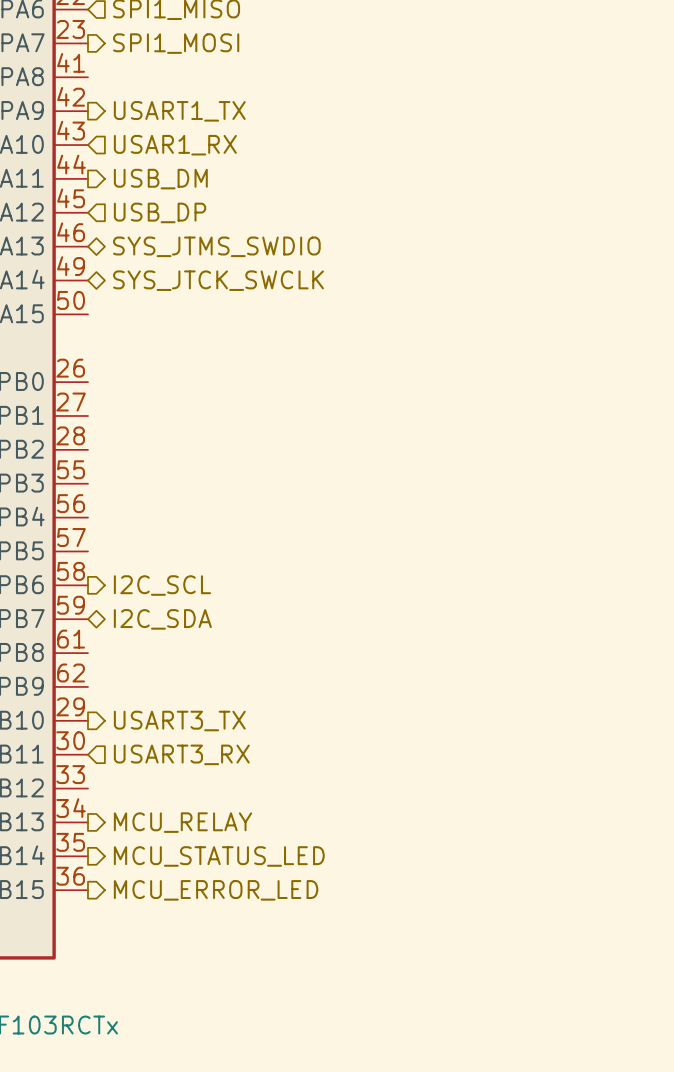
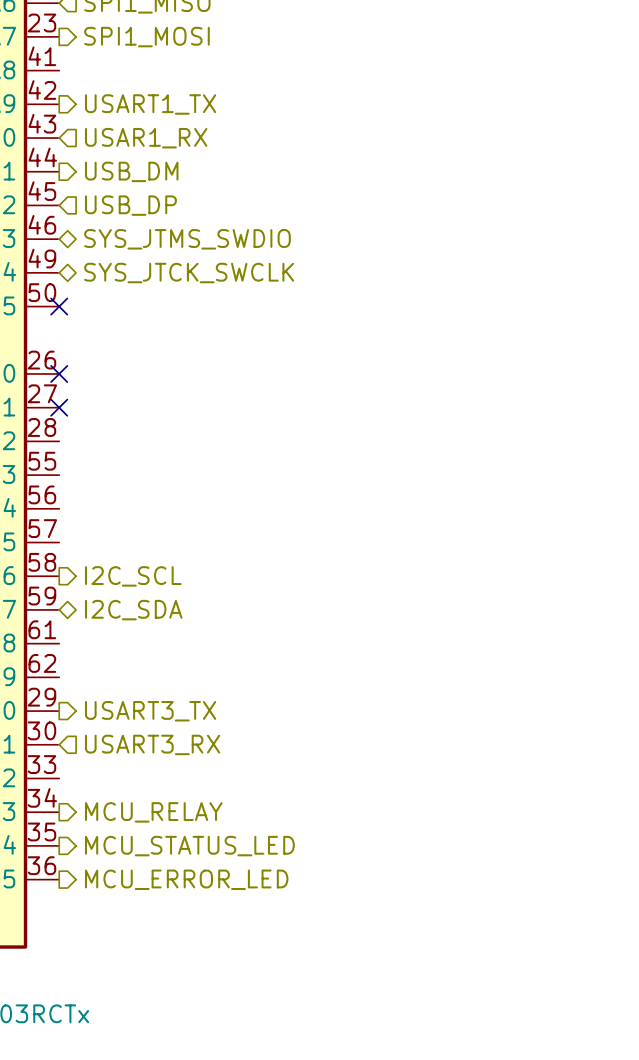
no-connect mark: none -> (59, 306)
no-connect mark: none -> (59, 373)
no-connect mark: none -> (59, 407)

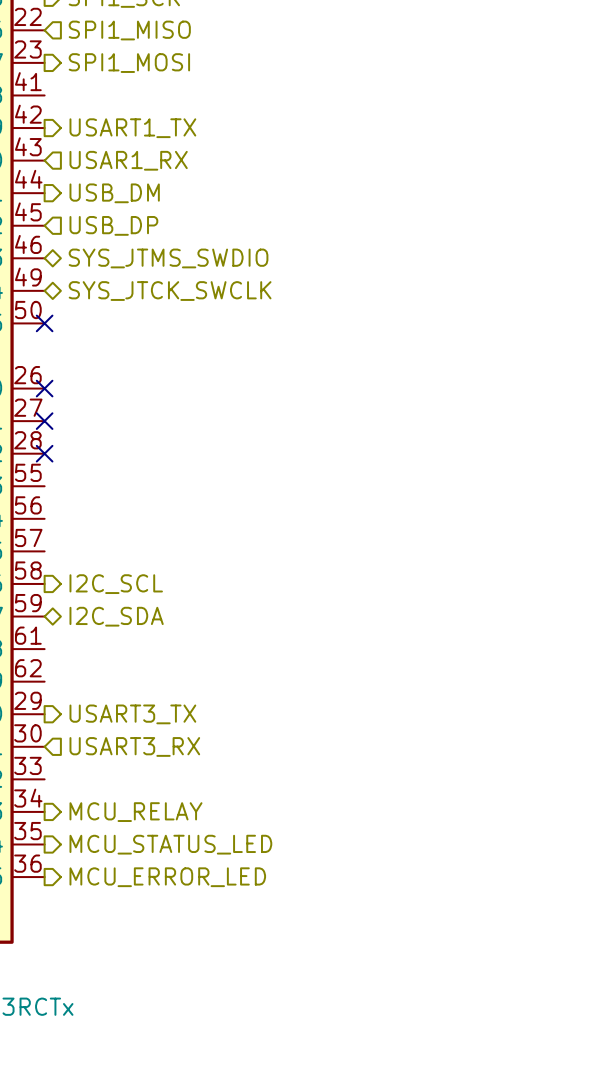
no-connect mark: none -> (44, 453)

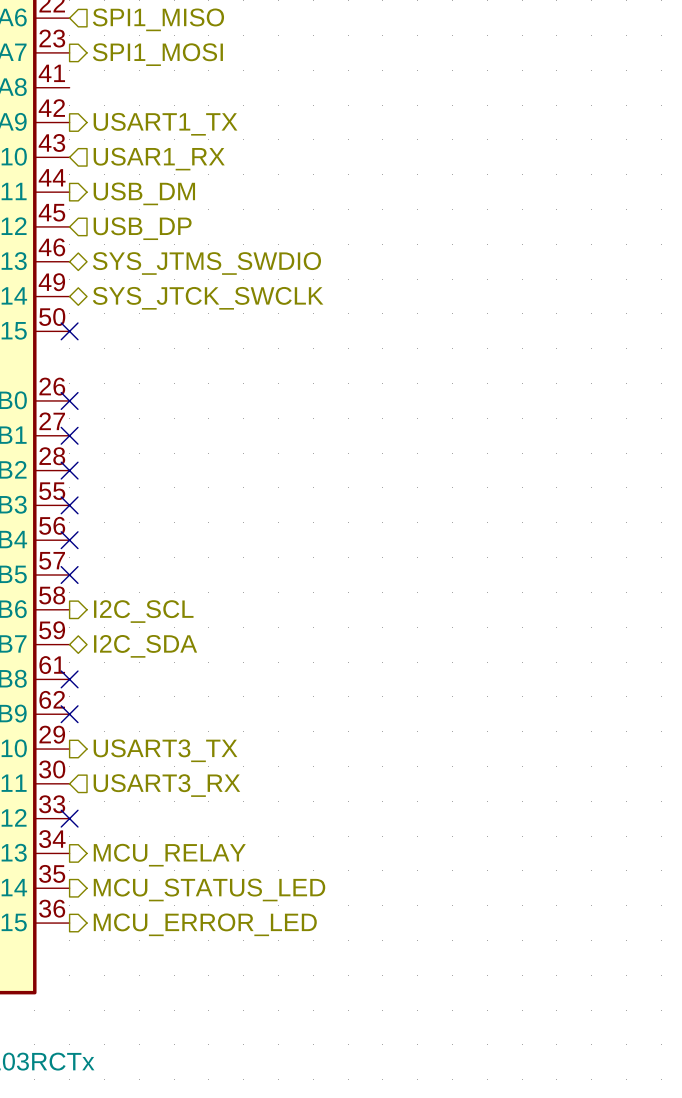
no-connect mark: none -> (69, 505)
no-connect mark: none -> (69, 540)
no-connect mark: none -> (69, 575)
no-connect mark: none -> (69, 679)
no-connect mark: none -> (69, 714)
no-connect mark: none -> (69, 818)

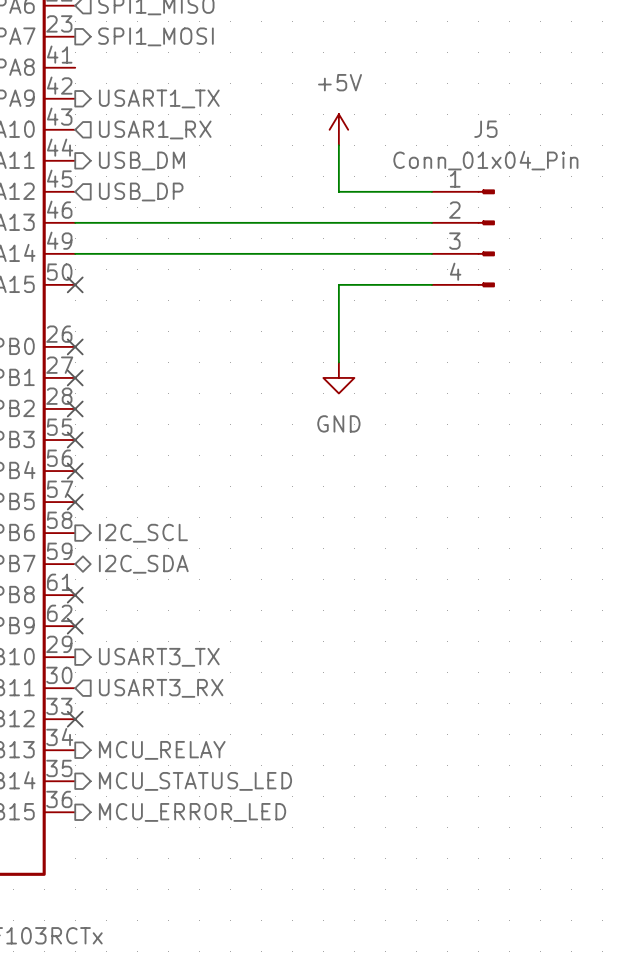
power symbol: none -> +5V (338, 129)
wire: none -> (338, 145) (338, 191) (431, 191)
wire: none -> (75, 222) (431, 222)
hierarchical label: SYS_JTMS_SWDIO (206, 263) -> none
J5: none -> Conn_01x04_Pin (463, 238)
wire: none -> (75, 253) (431, 253)
hierarchical label: SYS_JTCK_SWCLK (208, 298) -> none
wire: none -> (431, 284) (338, 284) (338, 362)
power symbol: none -> GND (338, 377)

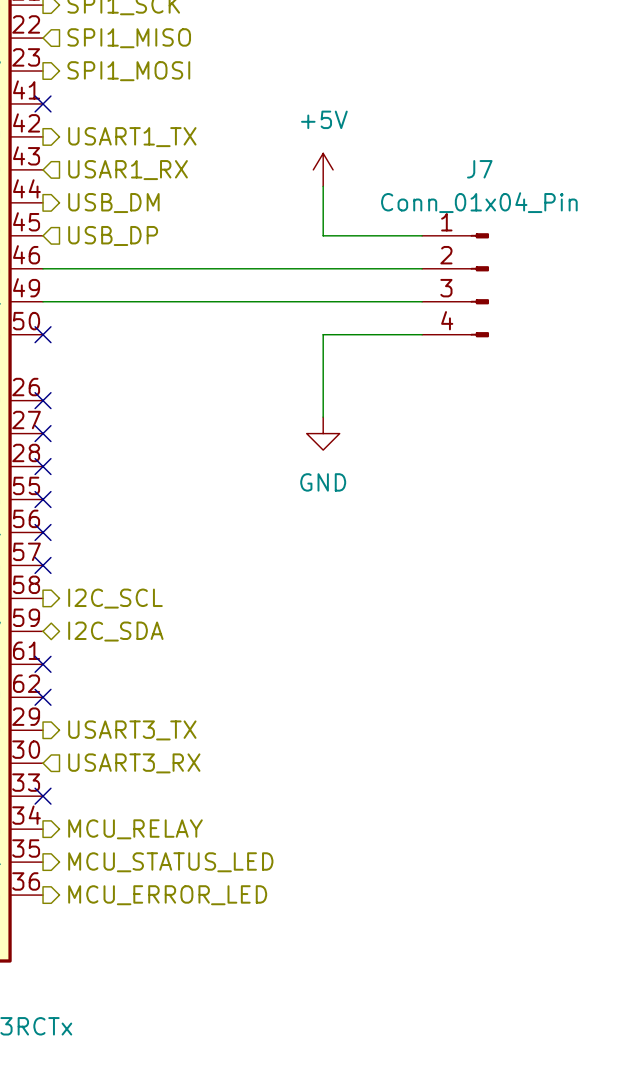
no-connect mark: none -> (43, 103)
J5 name: J5 (485, 129) -> J7 (479, 169)

